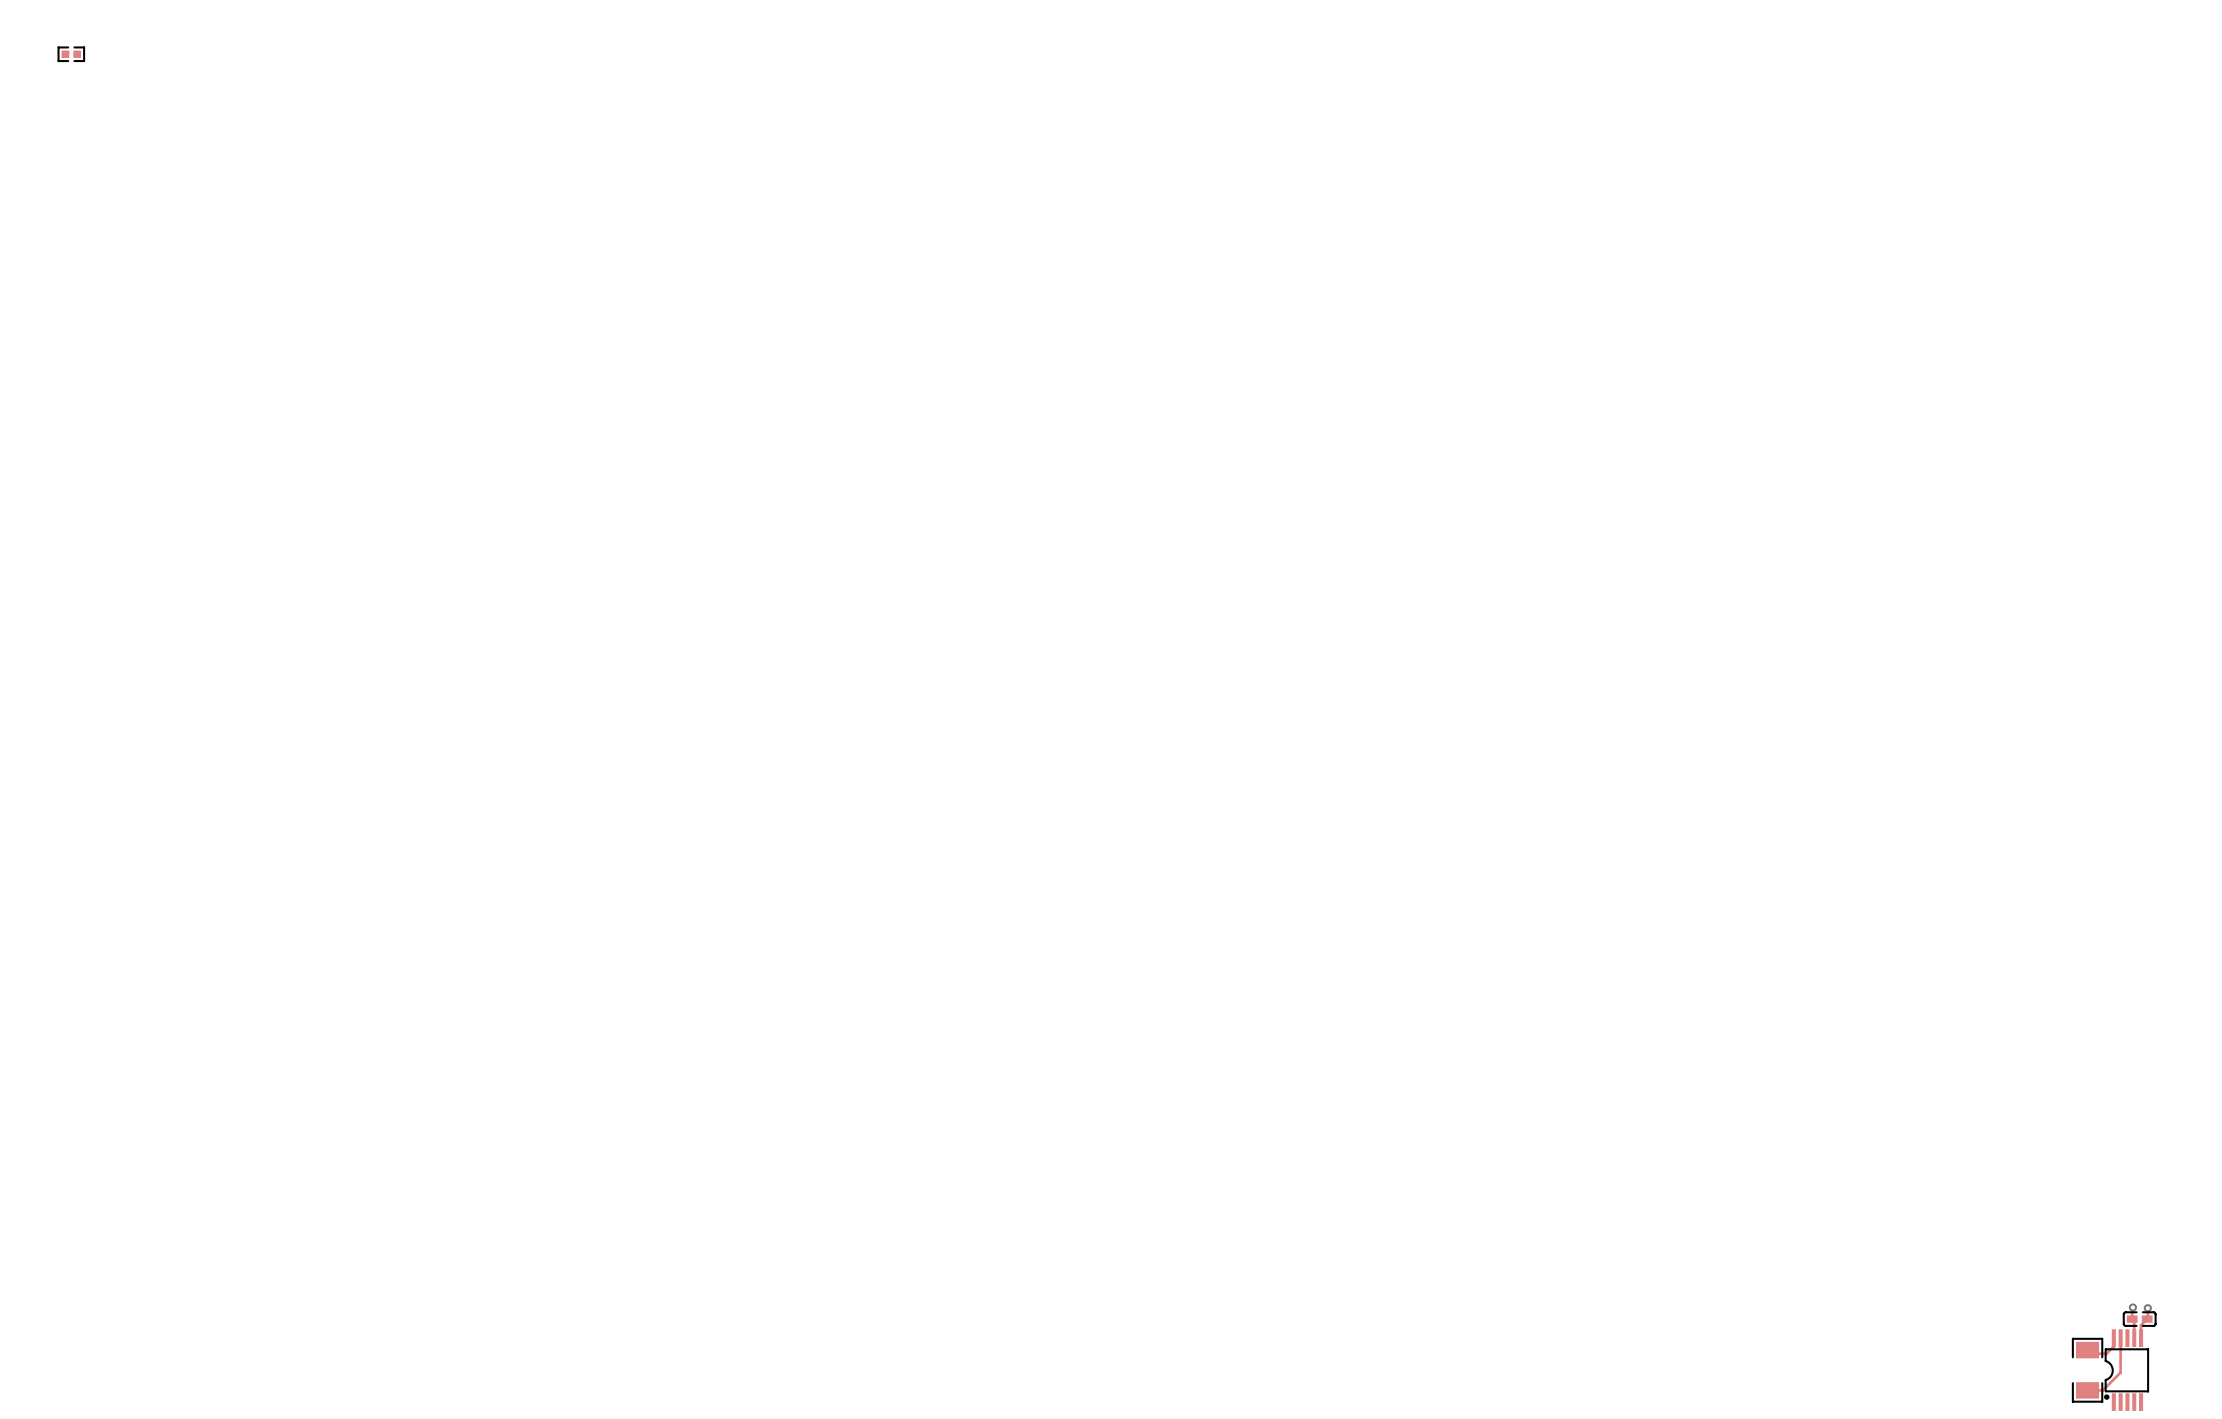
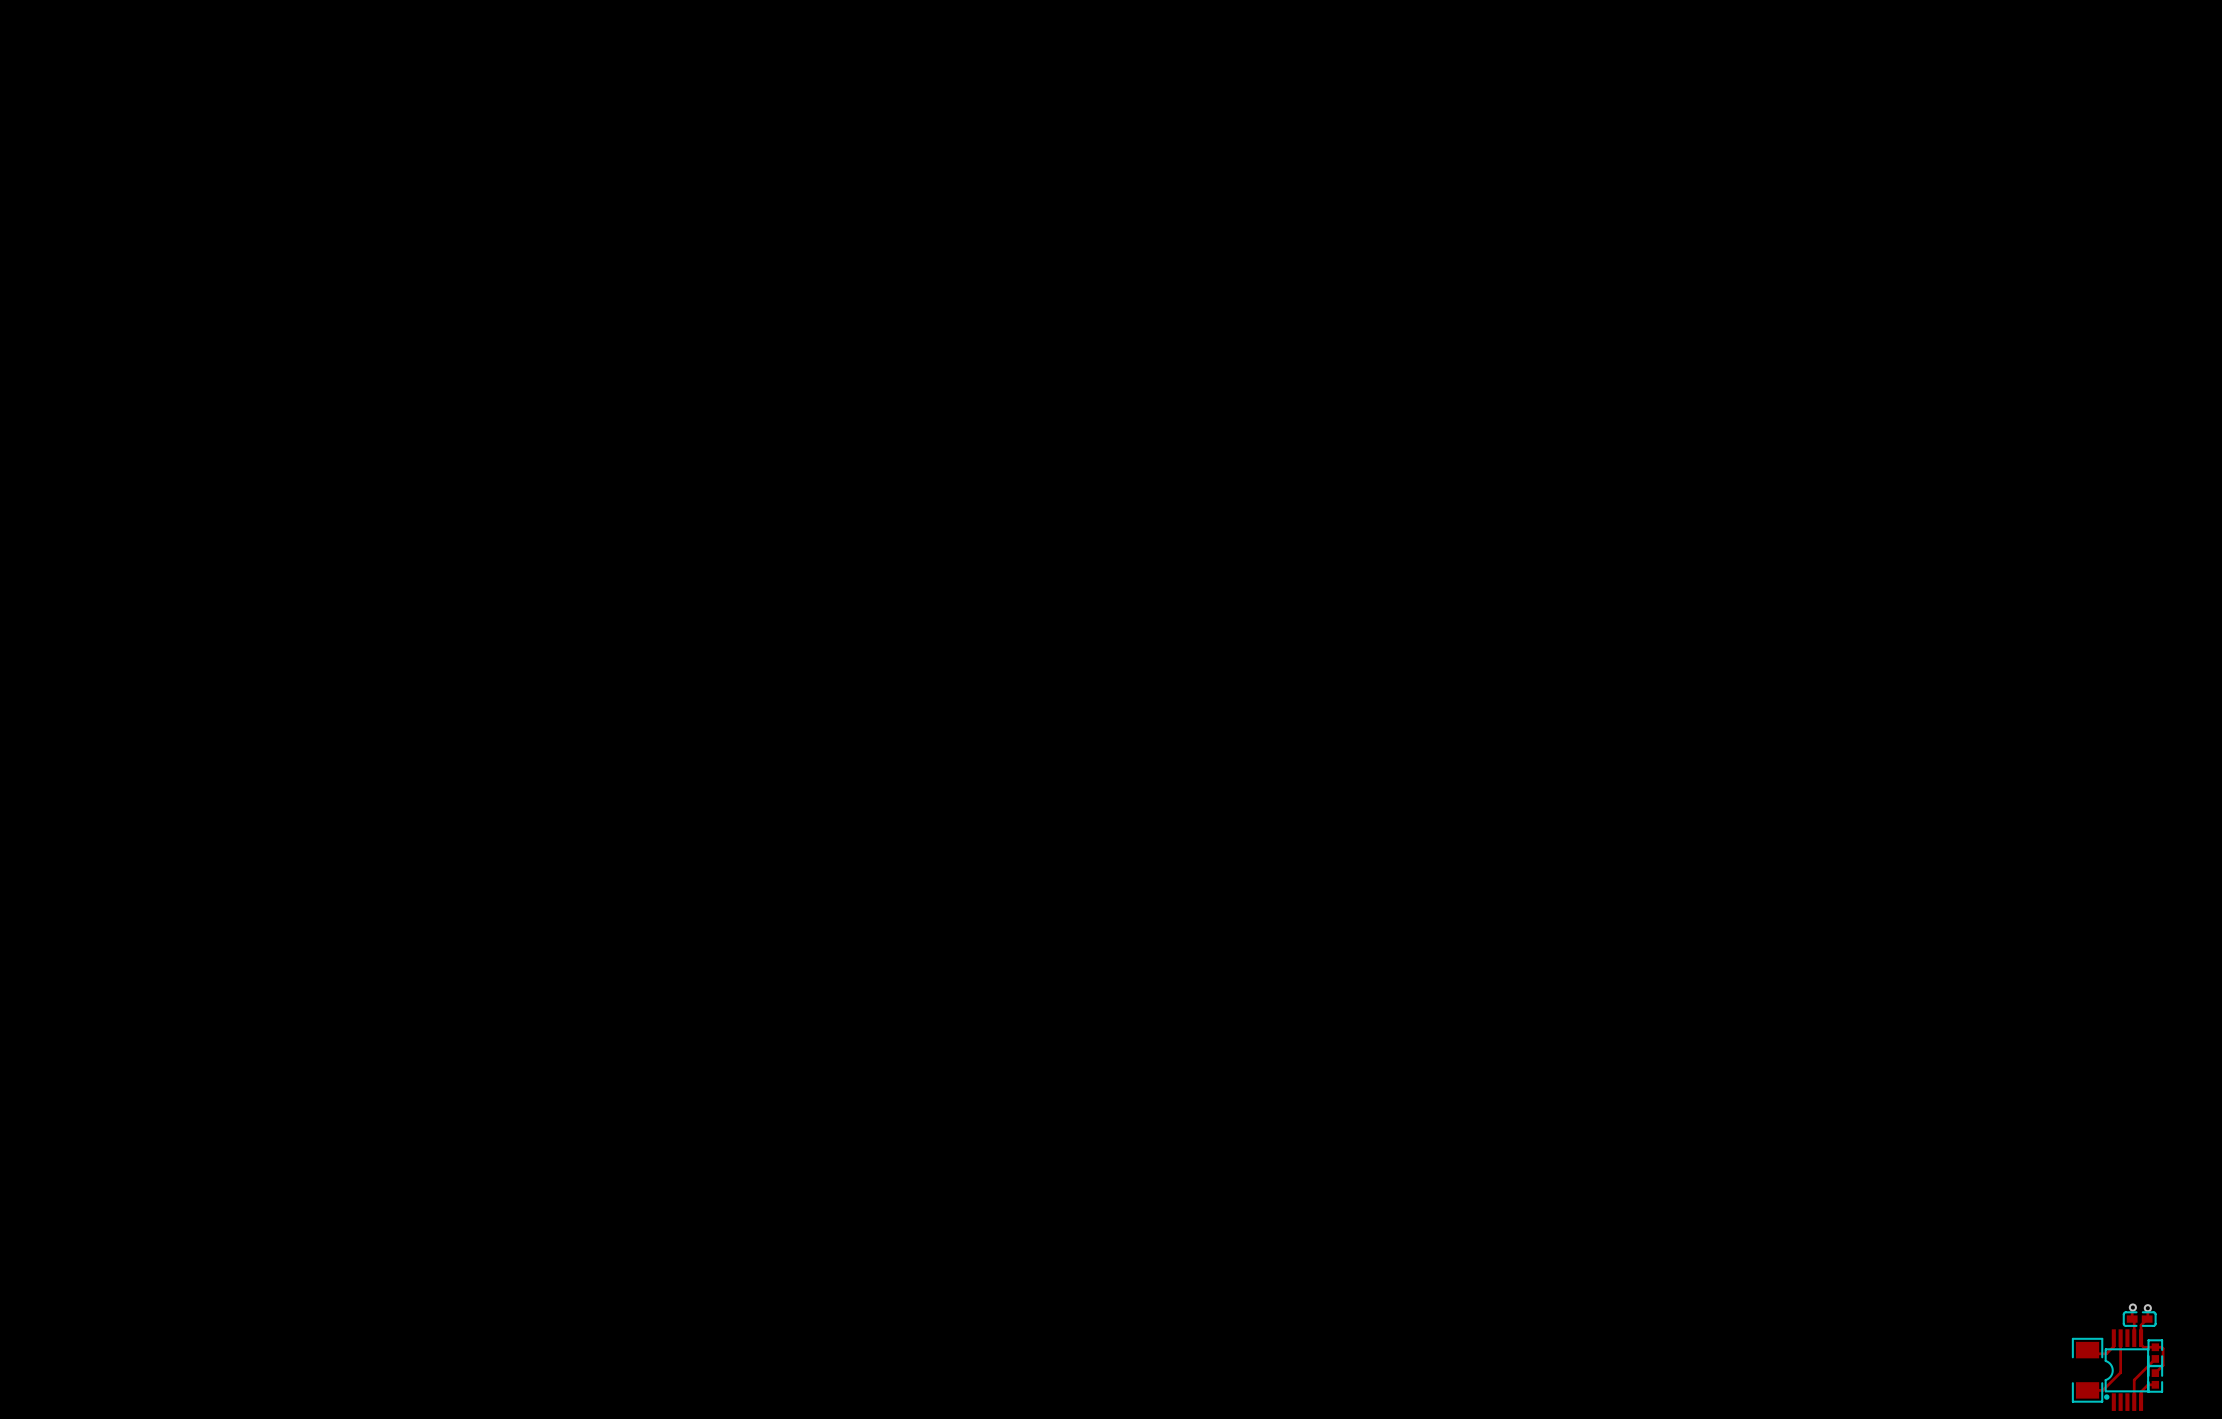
part: (71, 54) -> none
top track: none -> (2141, 1338) (2141, 1344) (2143, 1347) (2163, 1348) (2163, 1365) (2155, 1373)
part: none -> (2155, 1353)
top track: none -> (2155, 1358) (2134, 1380) (2134, 1402)
part: none -> (2155, 1378)
top track: none -> (2155, 1384) (2148, 1384) (2141, 1391) (2141, 1402)

